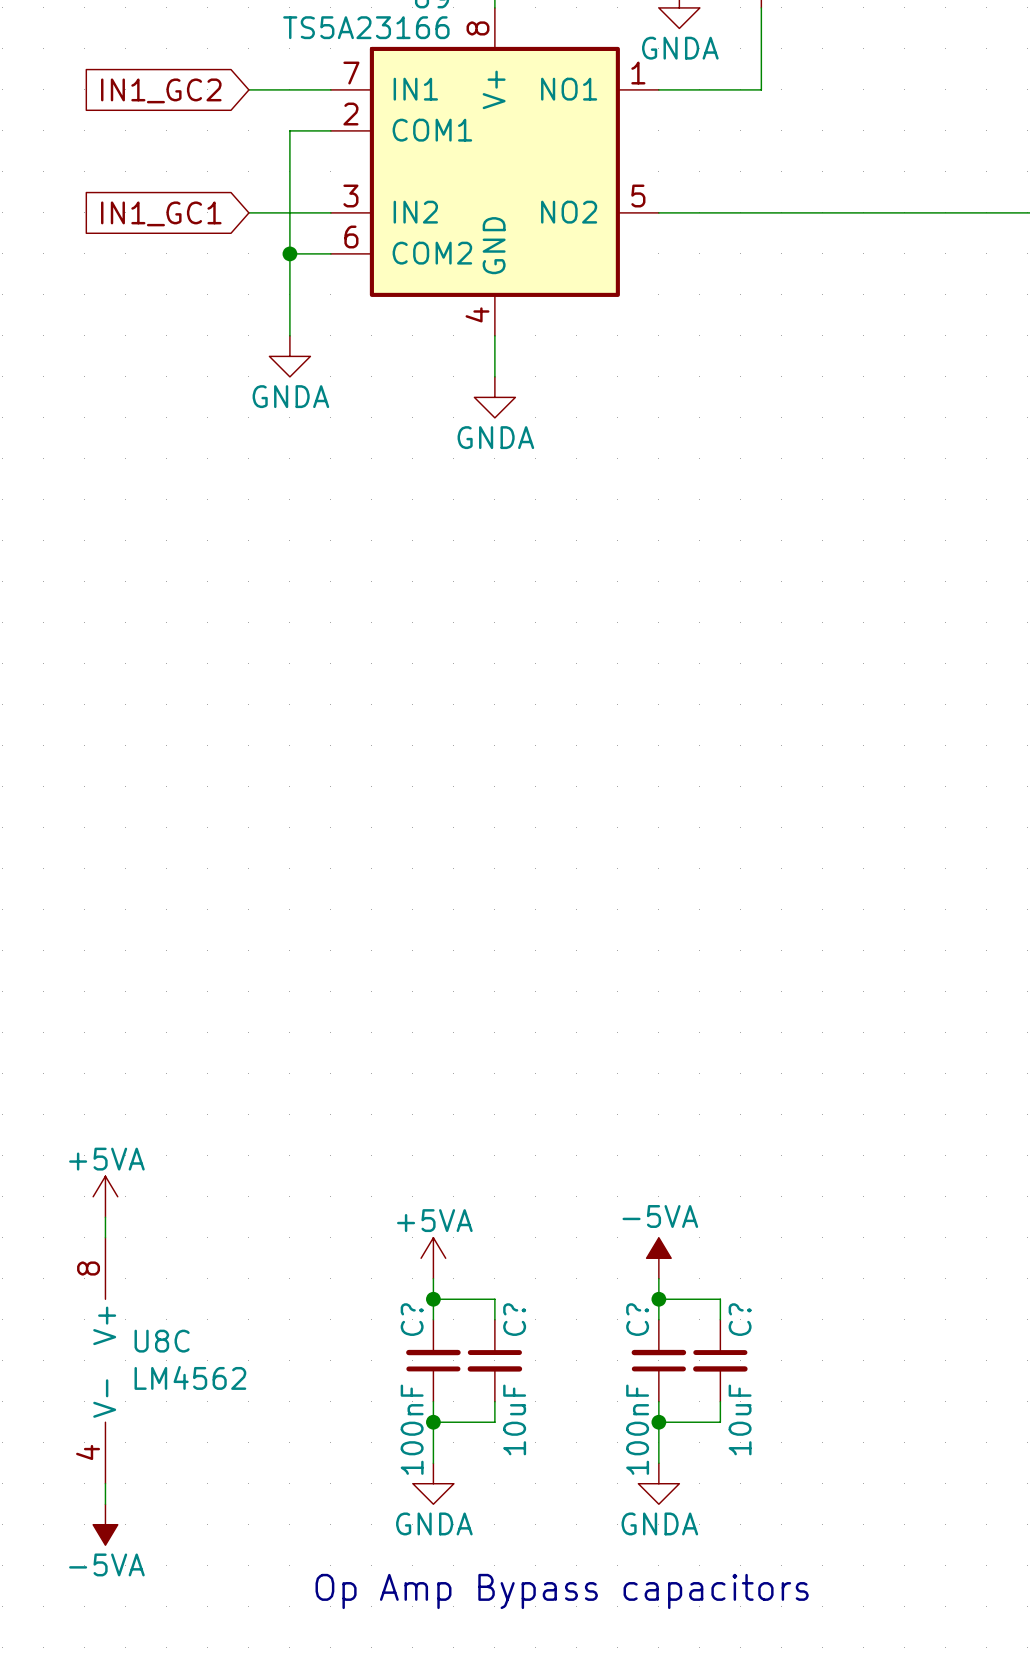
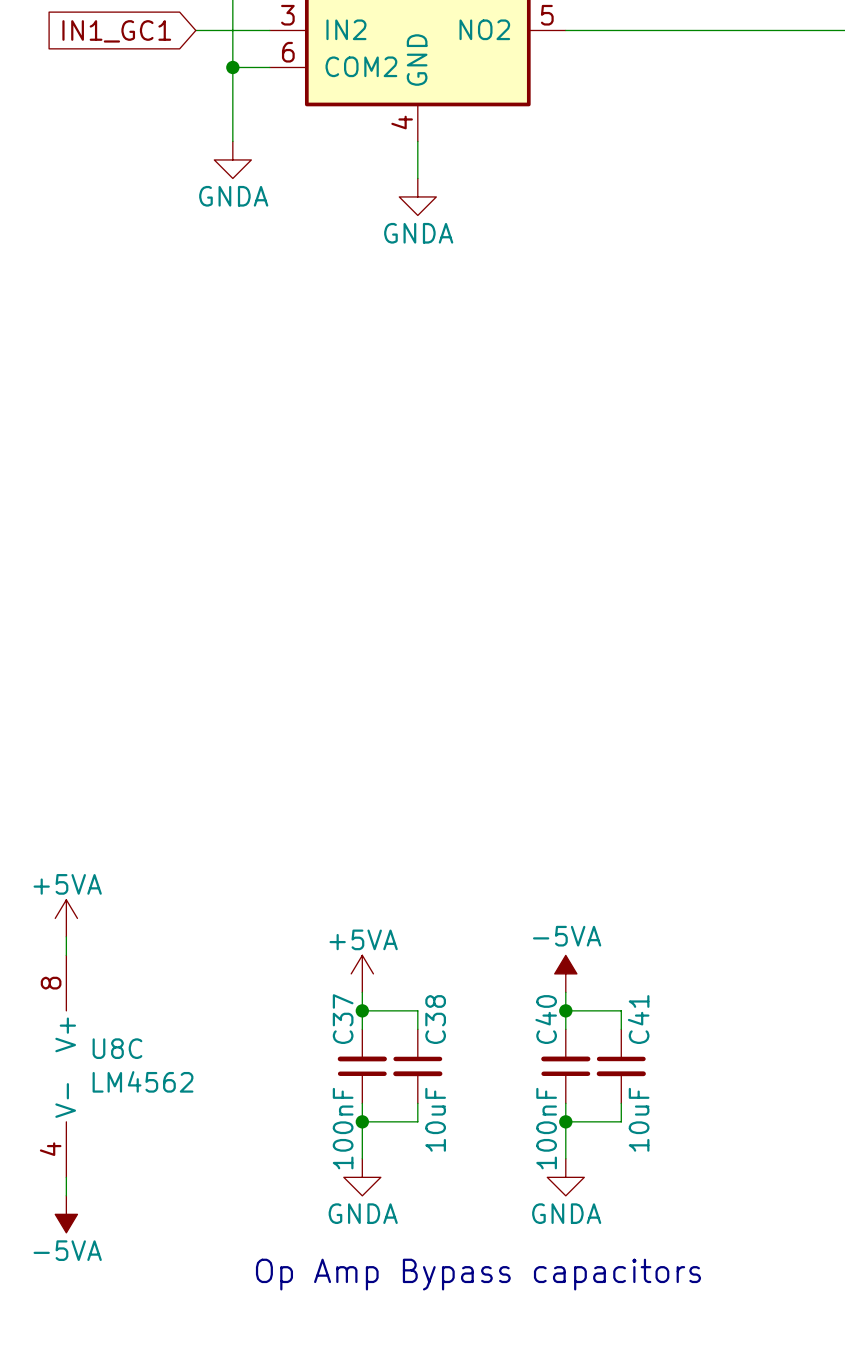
C? name: C? (412, 1319) -> C37 (343, 1019)
C? name: C? (514, 1319) -> C38 (435, 1019)
C? name: C? (637, 1319) -> C40 (546, 1019)
C? name: C? (740, 1319) -> C41 (638, 1019)

